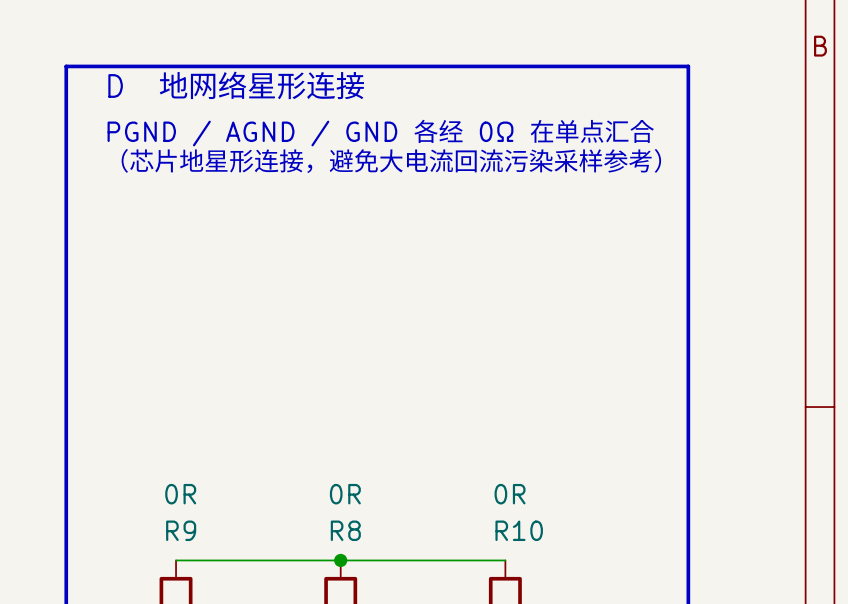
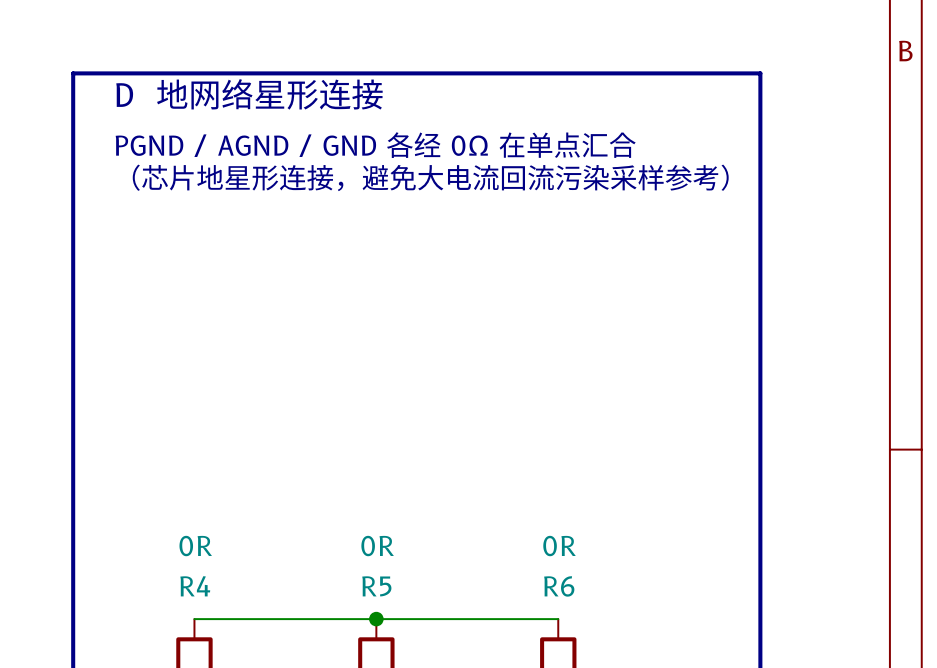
R9 name: R9 (181, 530) -> R4 (195, 586)
R8 name: R8 (345, 530) -> R5 (376, 586)
R10 name: R10 (519, 530) -> R6 (559, 586)

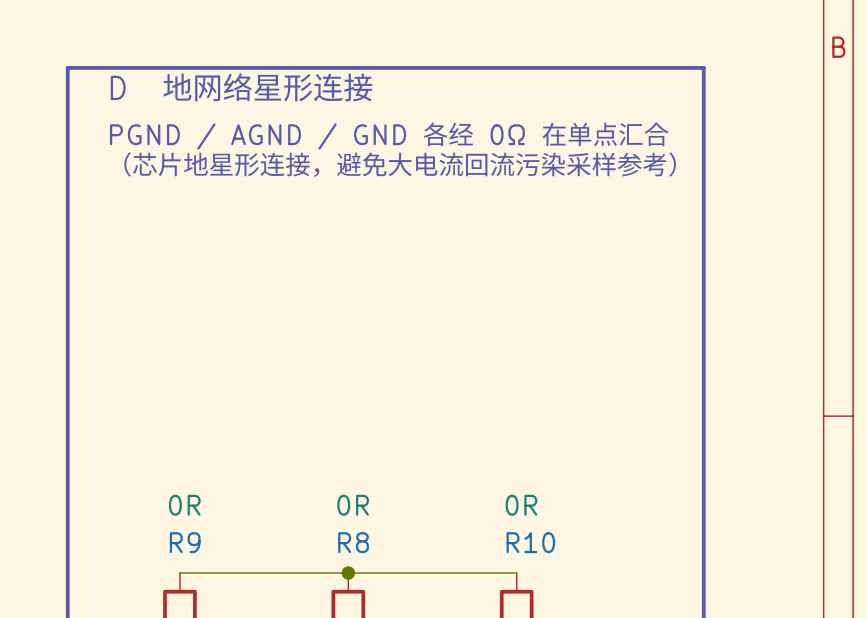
R4 name: R4 (195, 586) -> R9 (185, 542)
R5 name: R5 (376, 586) -> R8 (353, 542)
R6 name: R6 (559, 586) -> R10 (530, 542)

